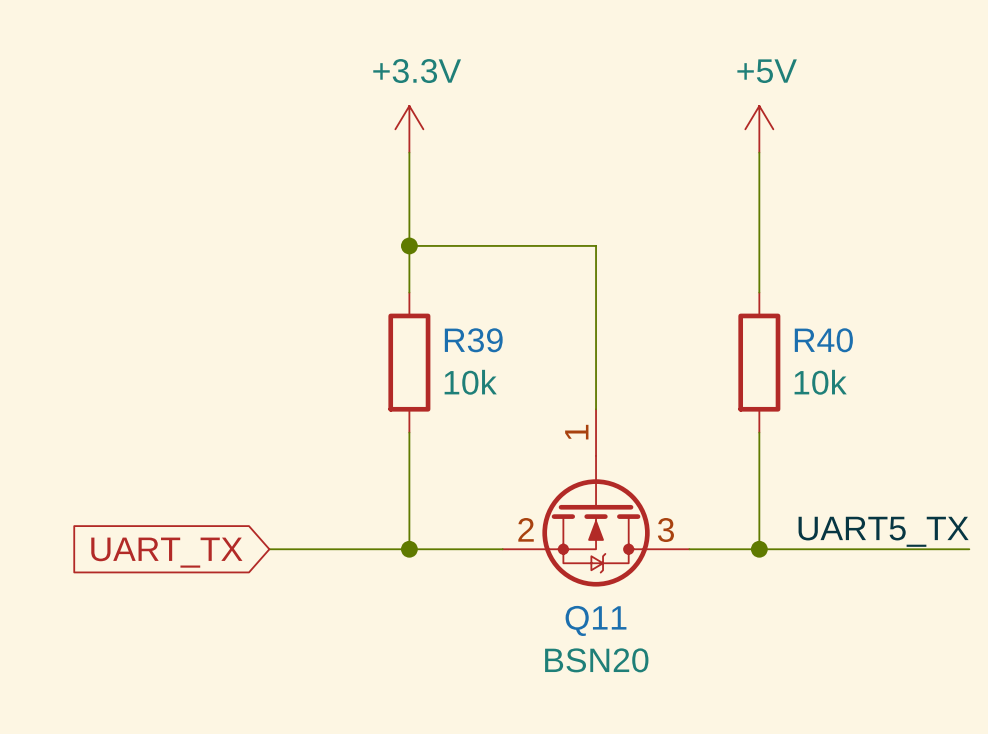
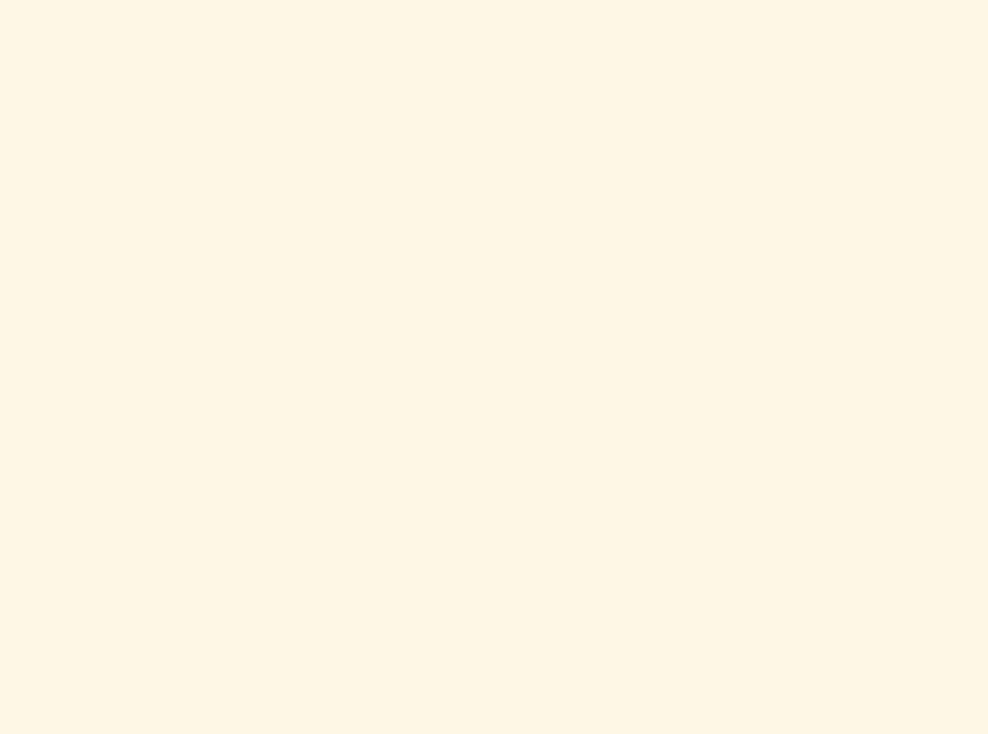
power symbol: +3.3V (409, 129) -> none
power symbol: +5V (759, 129) -> none
wire: (409, 152) (409, 292) -> none
wire: (759, 152) (759, 292) -> none
wire: (409, 245) (596, 245) (596, 409) -> none
junction: (409, 245) -> none
R39: 10k (409, 362) -> none
R40: 10k (759, 362) -> none
wire: (409, 432) (409, 549) -> none
wire: (759, 432) (759, 549) -> none
Q11: BSN20 (596, 497) -> none
label: UART5_TX (883, 531) -> none
wire: (269, 549) (502, 549) -> none
junction: (409, 549) -> none
wire: (689, 549) (969, 549) -> none
junction: (759, 549) -> none
global label: UART_TX (166, 552) -> none

